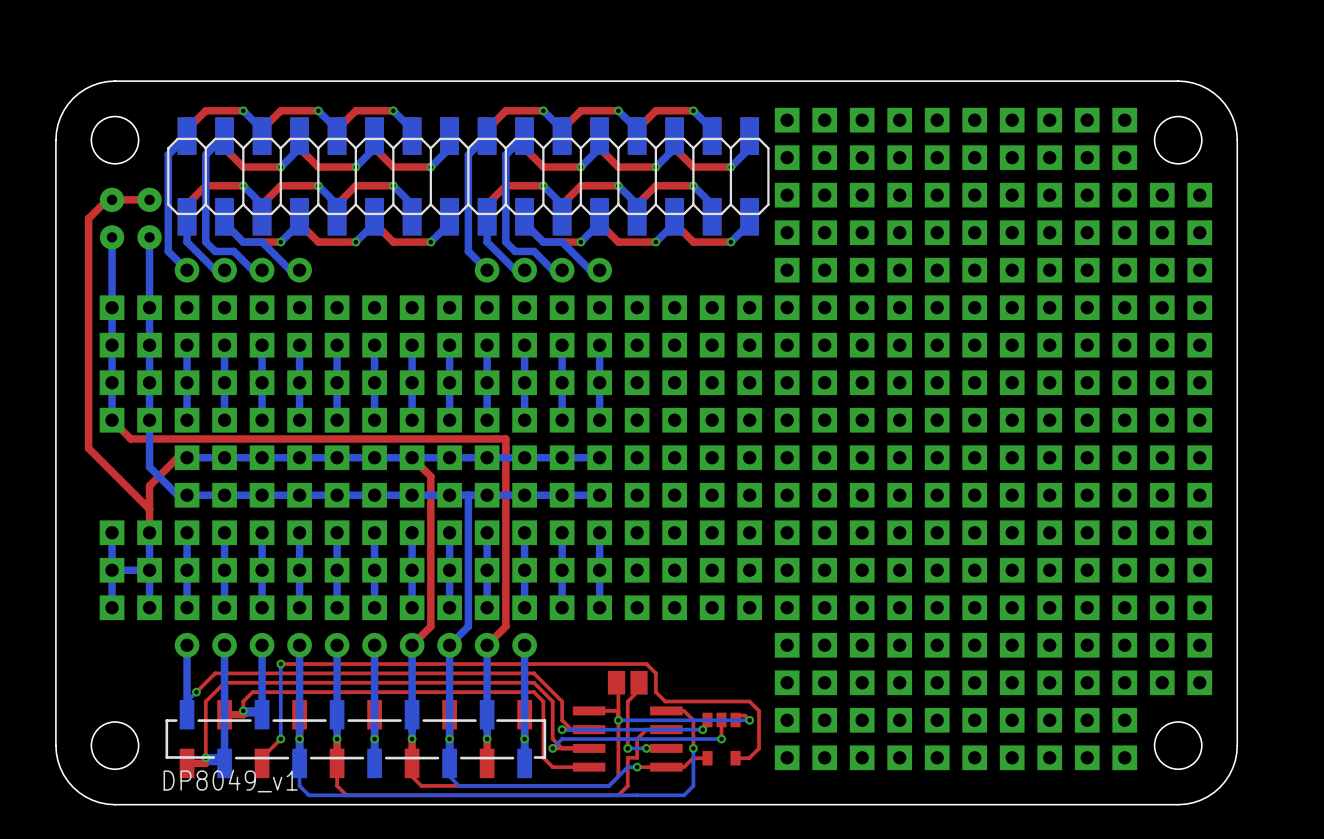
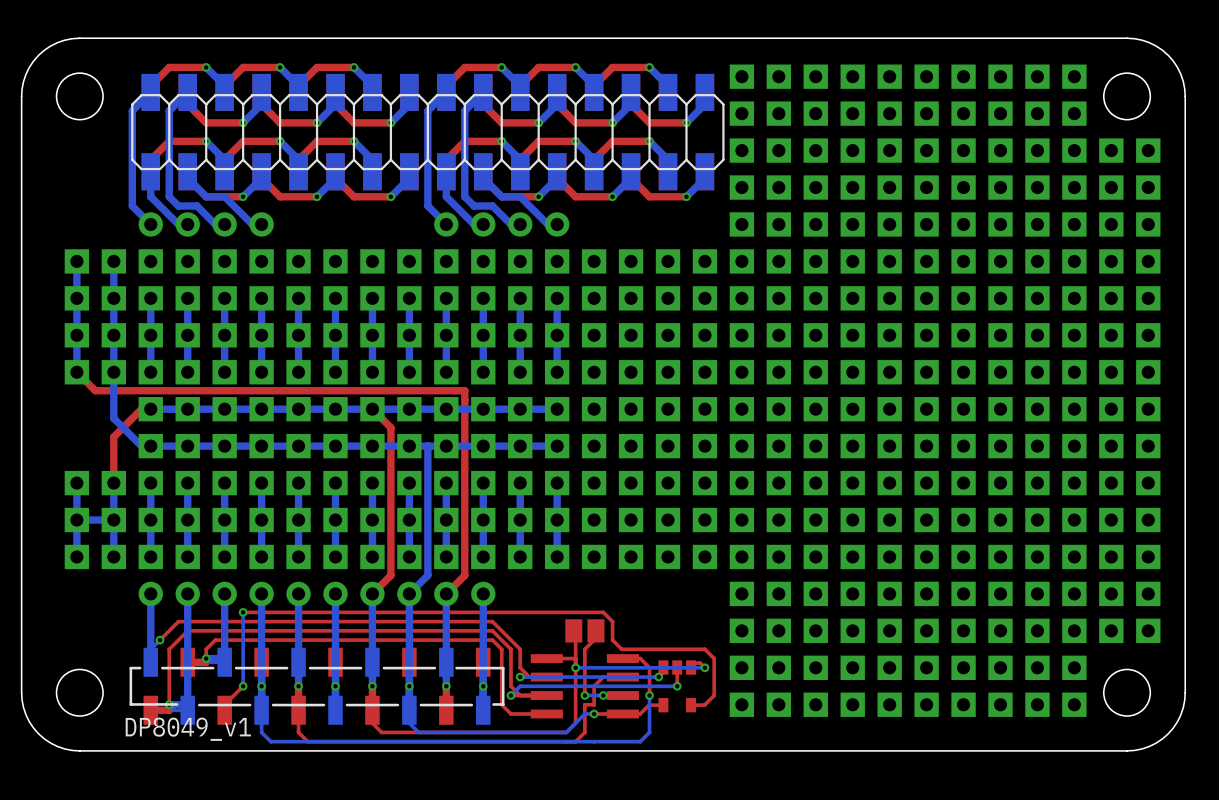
top track: (149, 199) (107, 199) (88, 218) (88, 448) (149, 509) -> none
part: (112, 218) -> none
part: (149, 218) -> none
bottom track: (112, 237) (112, 307) -> none
bottom track: (149, 237) (149, 307) -> none

